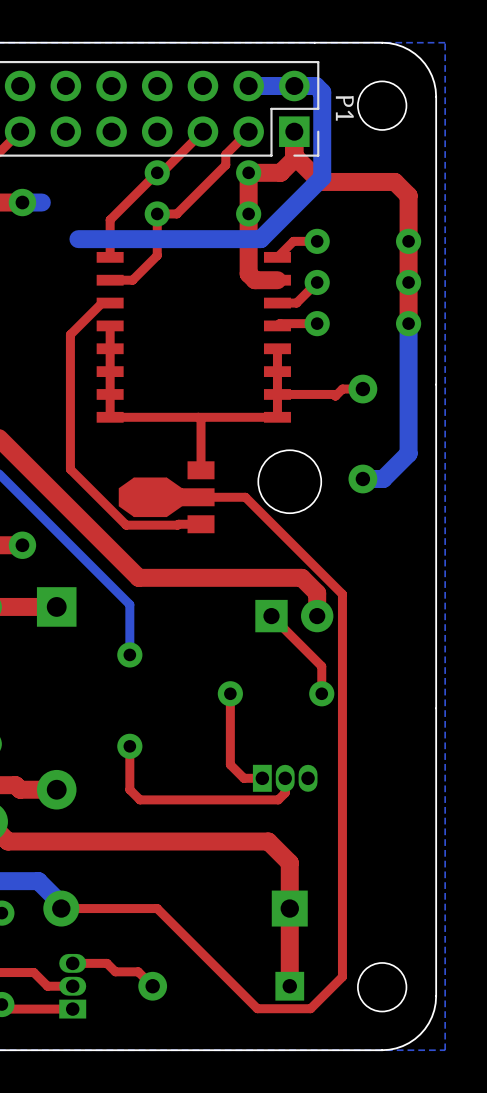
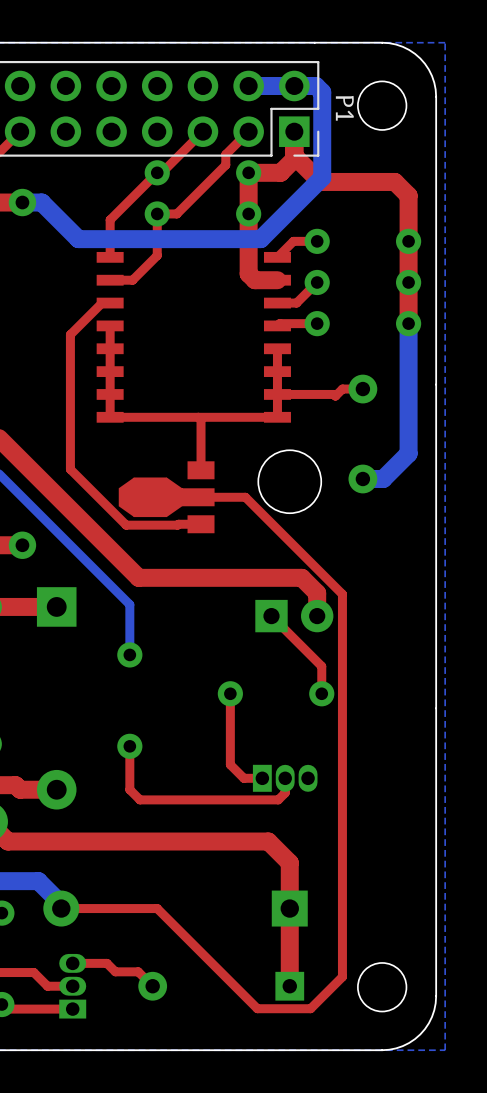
bottom track: none -> (41, 202) (78, 239)

